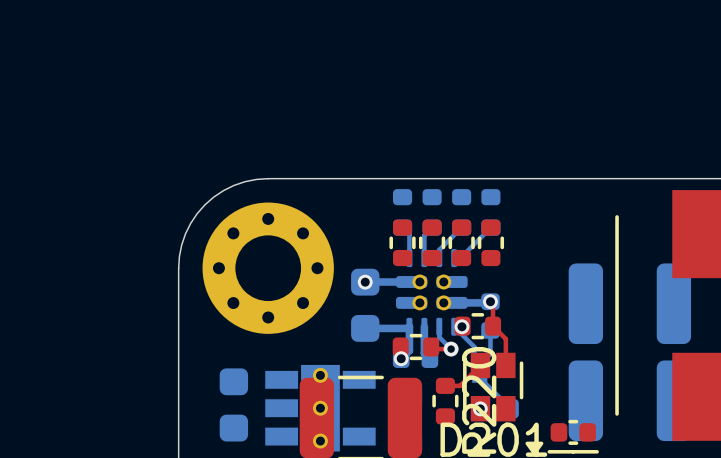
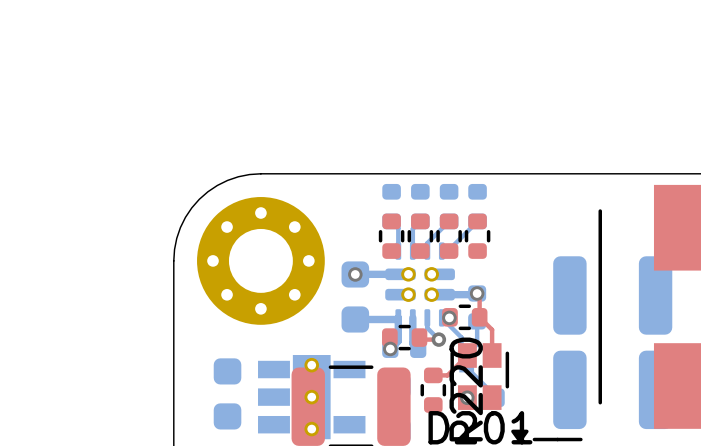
part: (573, 432) -> none

